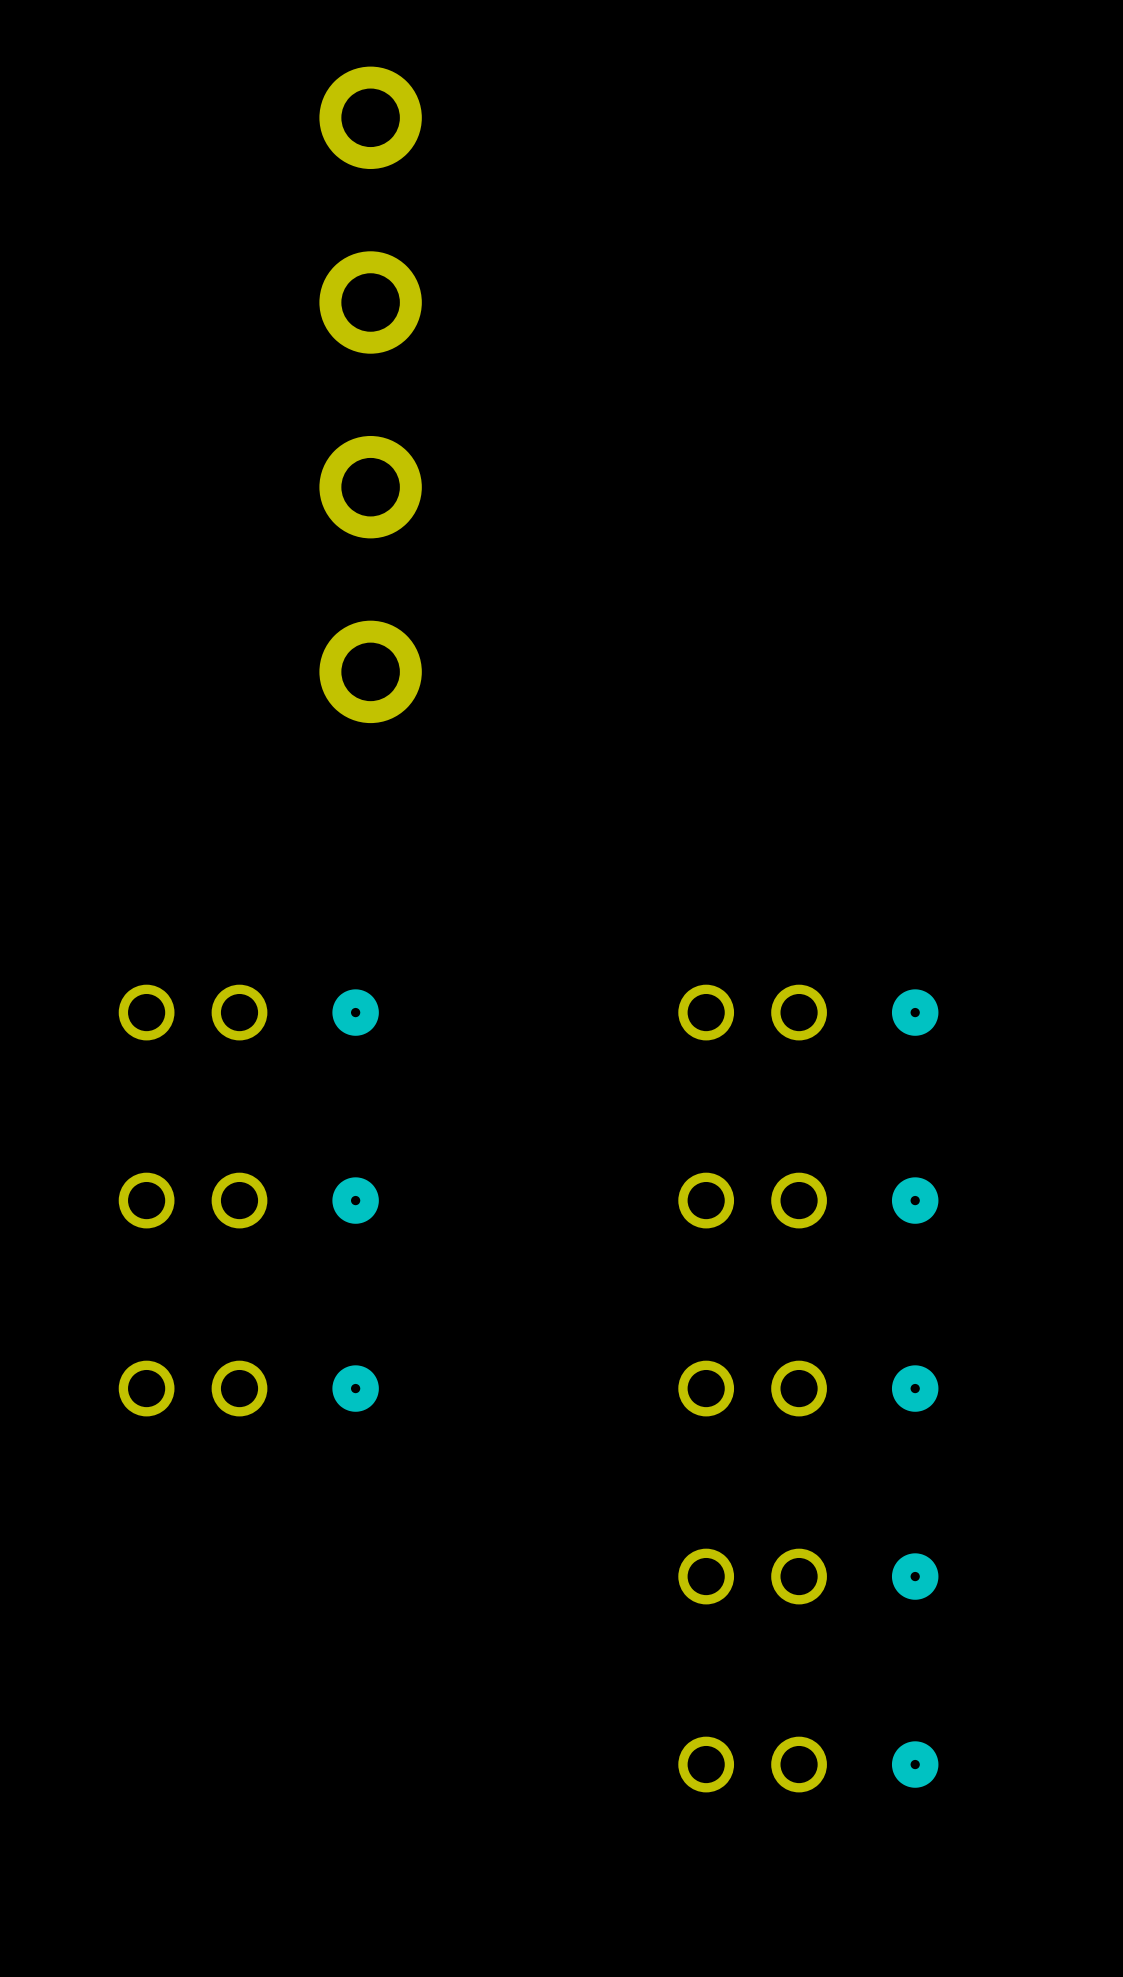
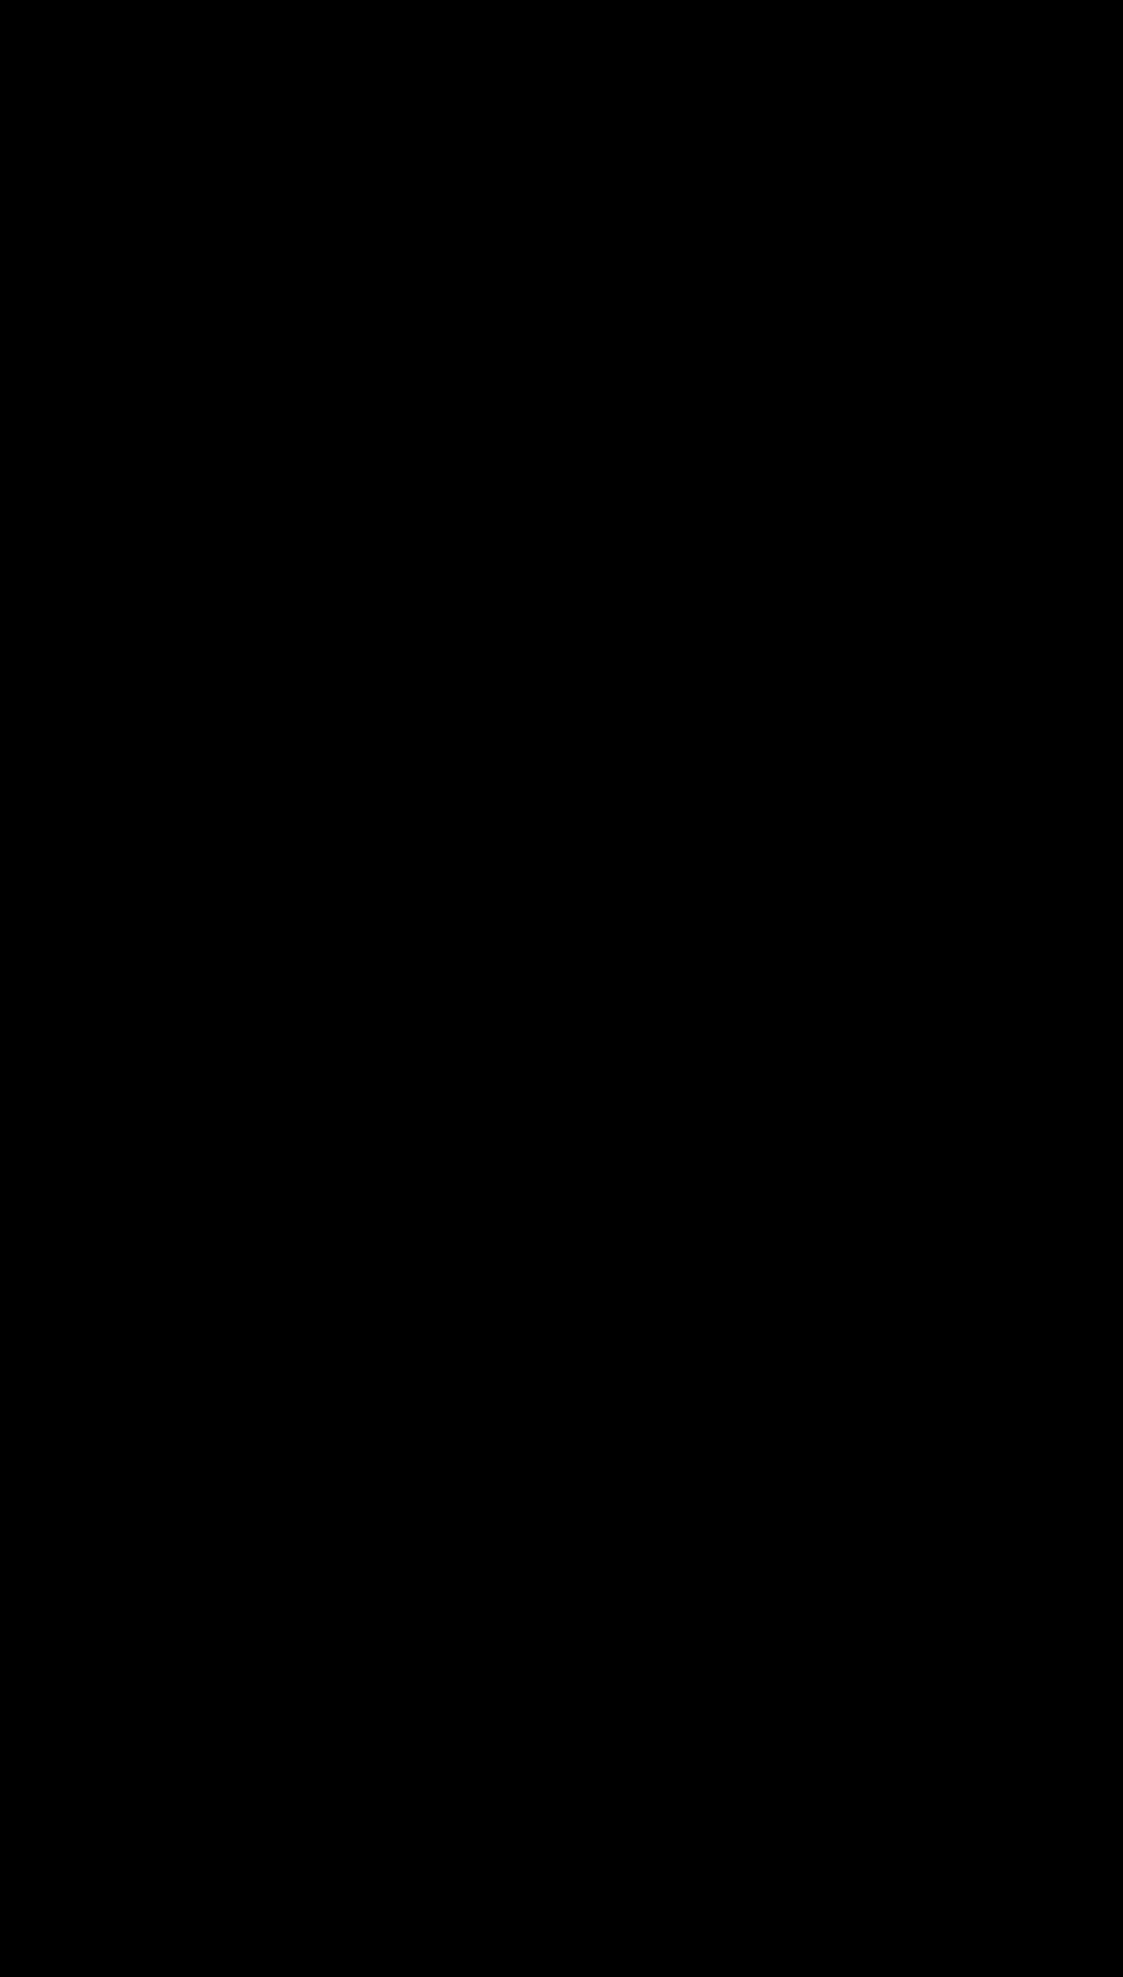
part: (370, 117) -> none
part: (370, 302) -> none
part: (370, 487) -> none
part: (370, 671) -> none
part: (248, 1012) -> none
part: (808, 1012) -> none
part: (248, 1200) -> none
part: (808, 1200) -> none
part: (248, 1388) -> none
part: (808, 1388) -> none
part: (808, 1576) -> none
part: (808, 1764) -> none

